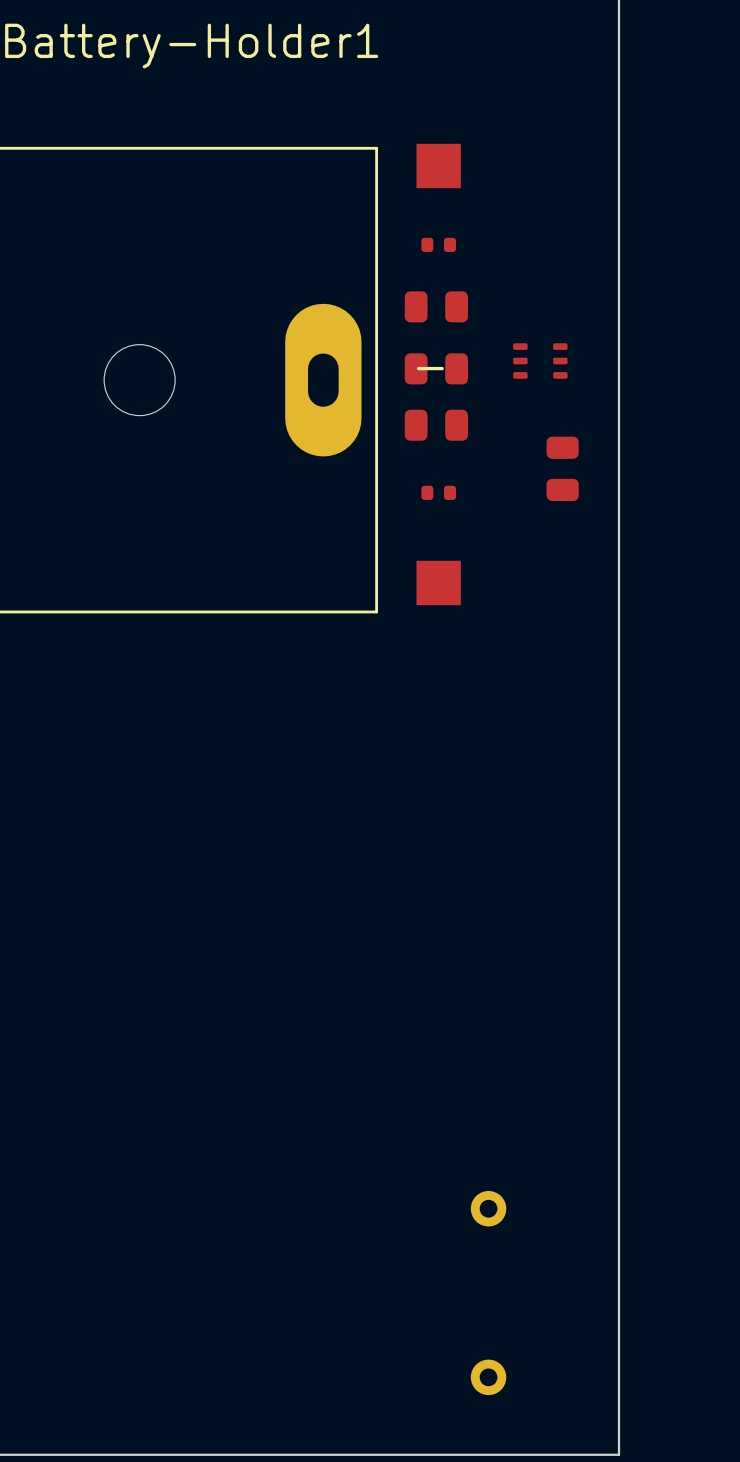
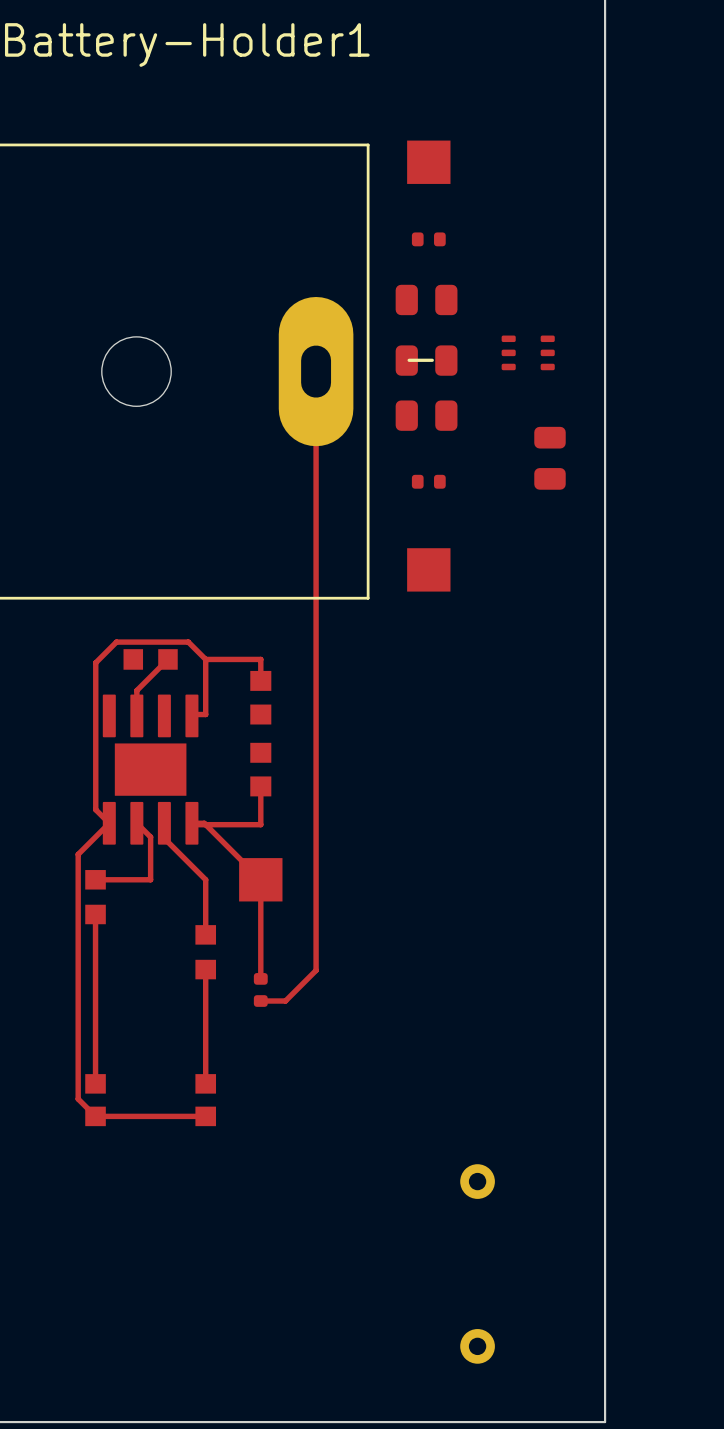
top track: none -> (316, 371) (316, 970) (285, 1001) (260, 1001)
part: none -> (150, 659)
top track: none -> (167, 659) (136, 690) (136, 715)
top track: none -> (205, 659) (205, 714) (191, 715)
top track: none -> (205, 659) (188, 642) (116, 642) (95, 662) (95, 809) (109, 823) (78, 854) (78, 1099) (95, 1116) (205, 1116)
top track: none -> (205, 659) (260, 659) (260, 680)
part: none -> (260, 697)
part: none -> (150, 769)
part: none -> (260, 769)
top track: none -> (260, 786) (260, 824) (193, 824) (191, 823) (204, 823) (260, 879) (260, 978)
top track: none -> (136, 823) (150, 837) (150, 879) (95, 879)
top track: none -> (164, 823) (164, 838) (205, 879) (205, 934)
part: none -> (260, 879)
part: none -> (95, 897)
top track: none -> (95, 914) (95, 1083)
part: none -> (205, 952)
top track: none -> (205, 969) (205, 1083)
part: none -> (260, 989)
part: none -> (95, 1100)
part: none -> (205, 1100)

